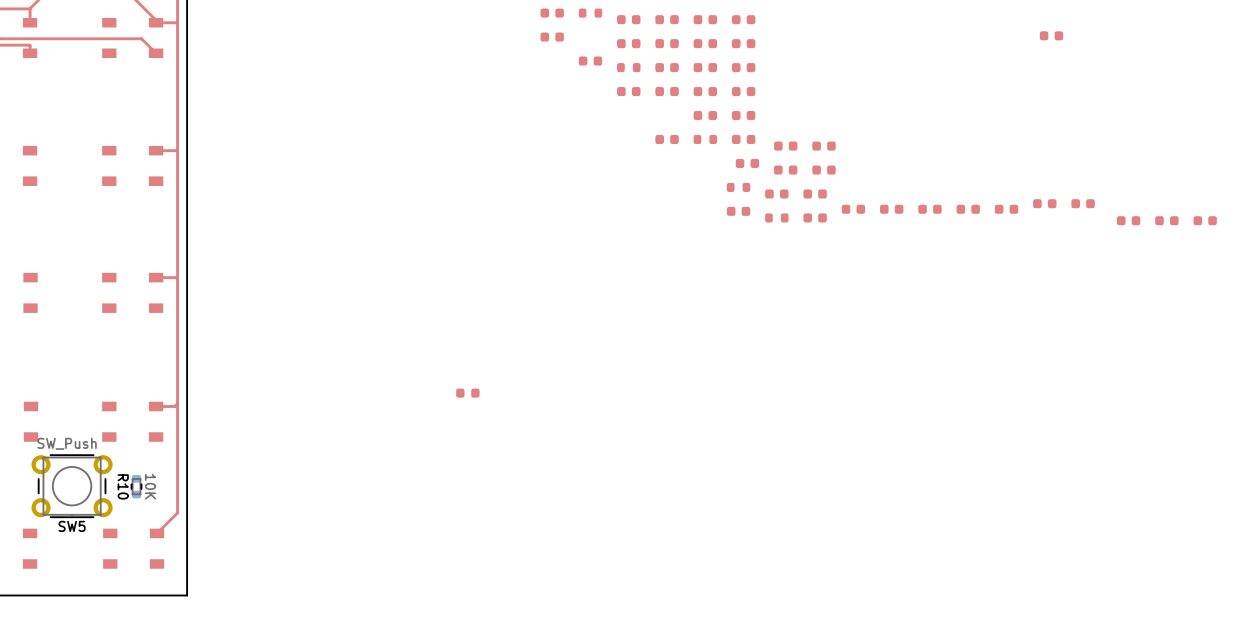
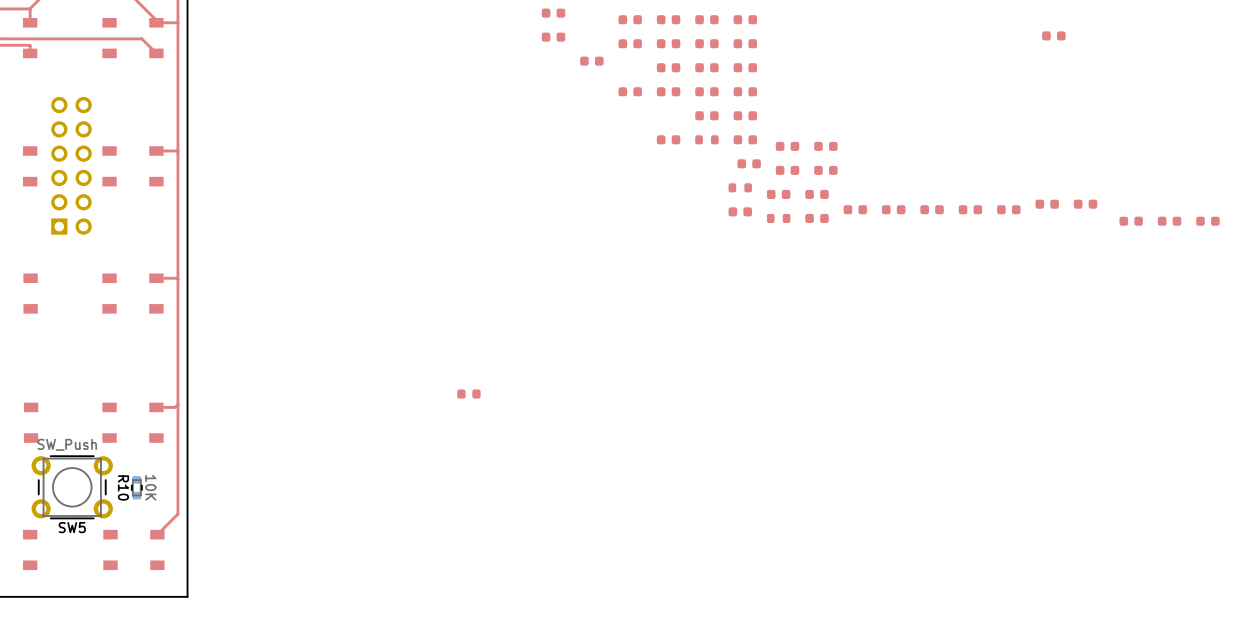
part: (590, 13) -> none
part: (628, 67) -> none
part: none -> (71, 165)

